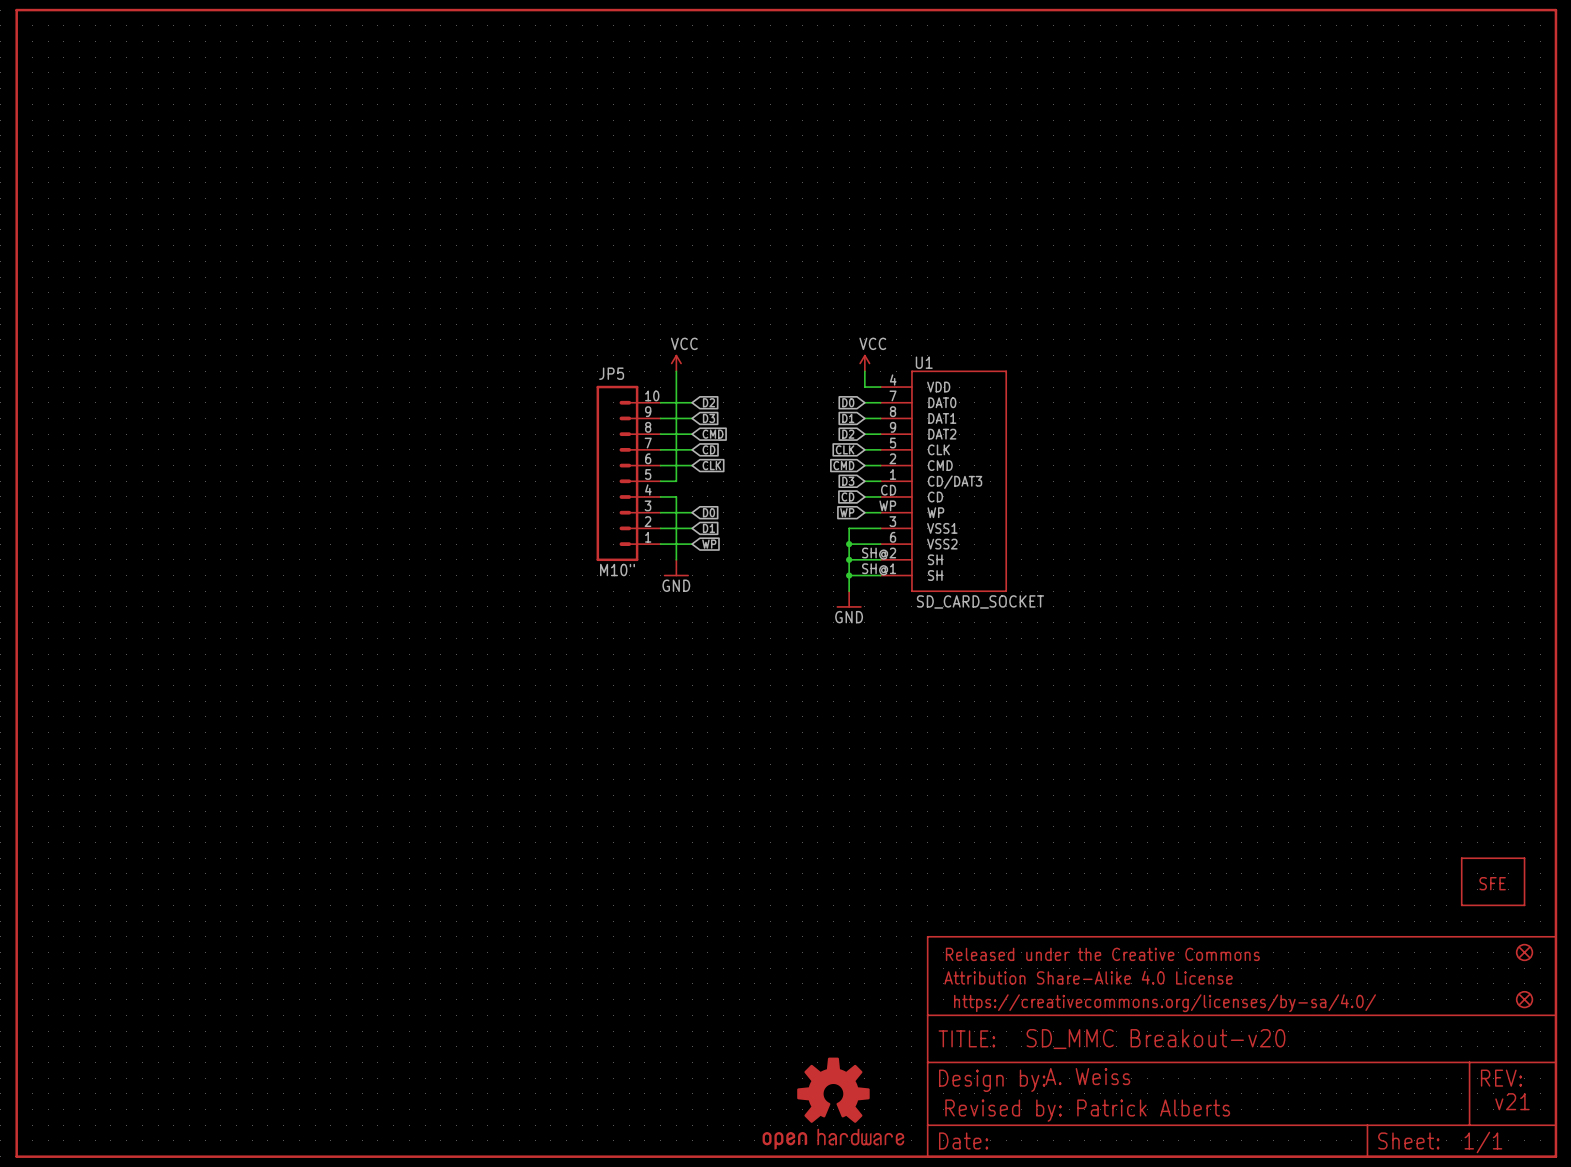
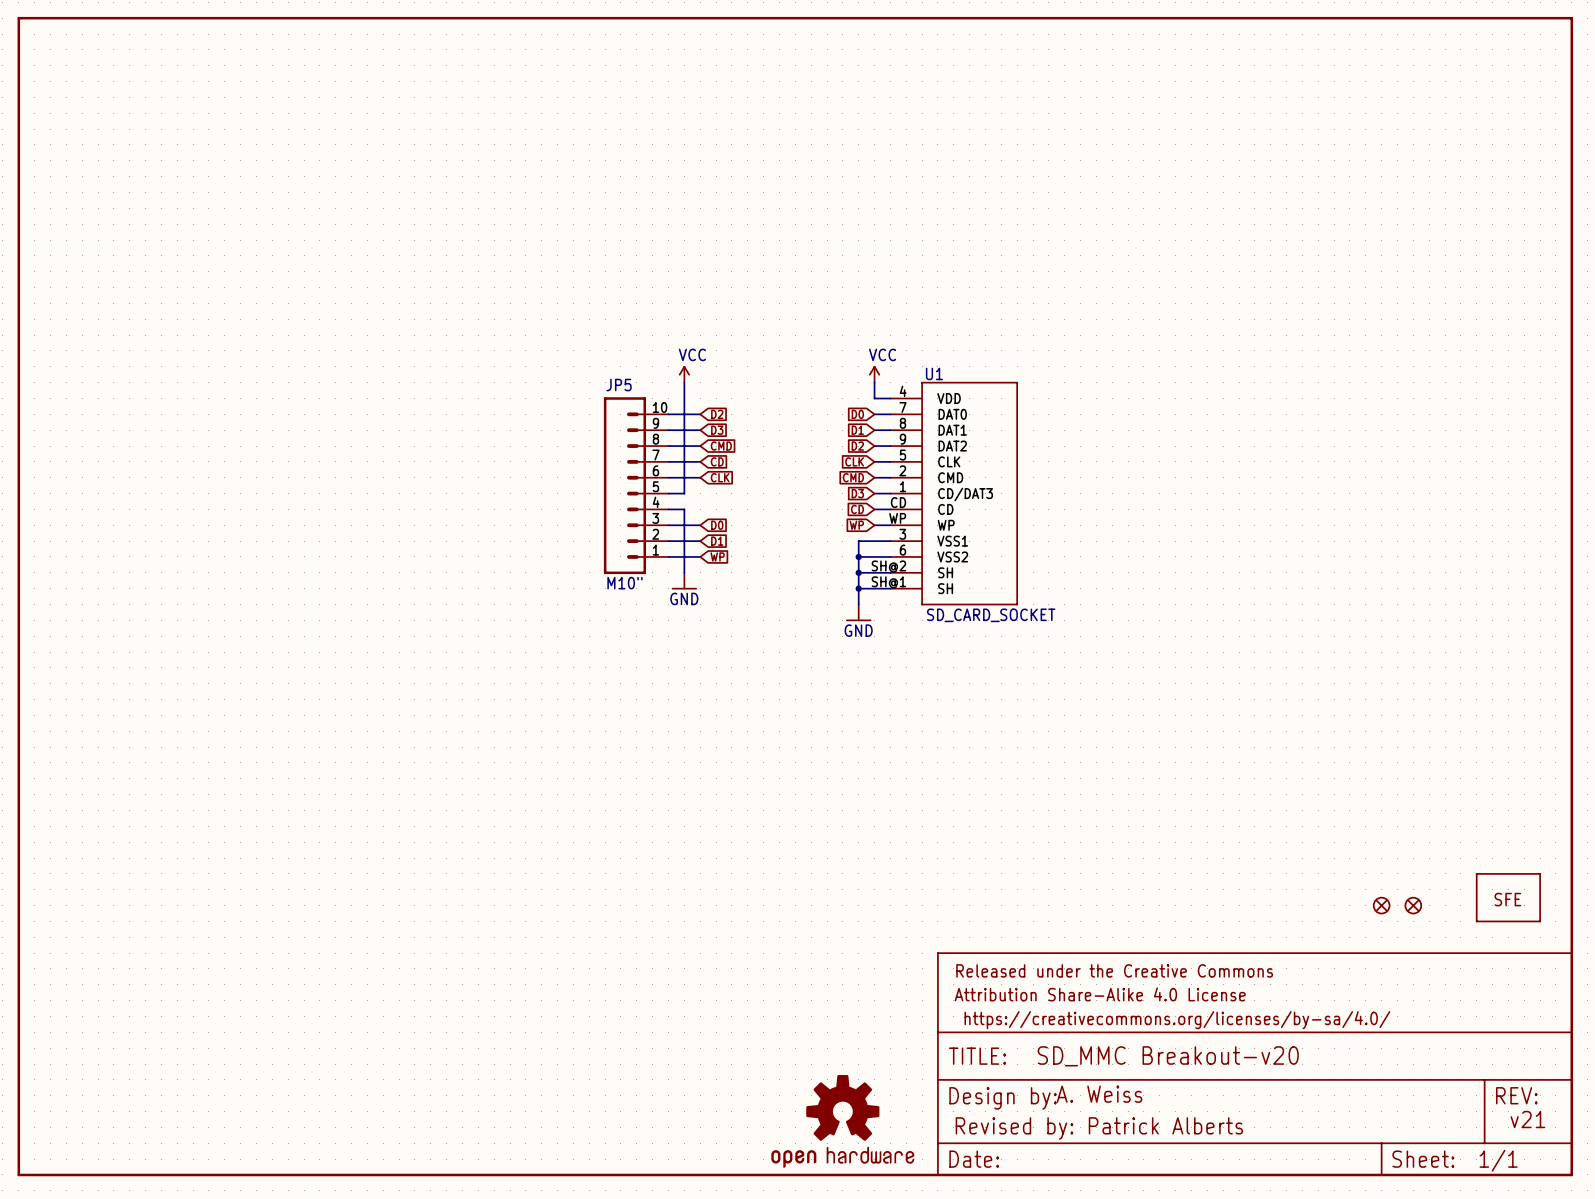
part: none -> (1381, 905)
part: none -> (1413, 905)
part: (1524, 952) -> none
part: (1524, 999) -> none

